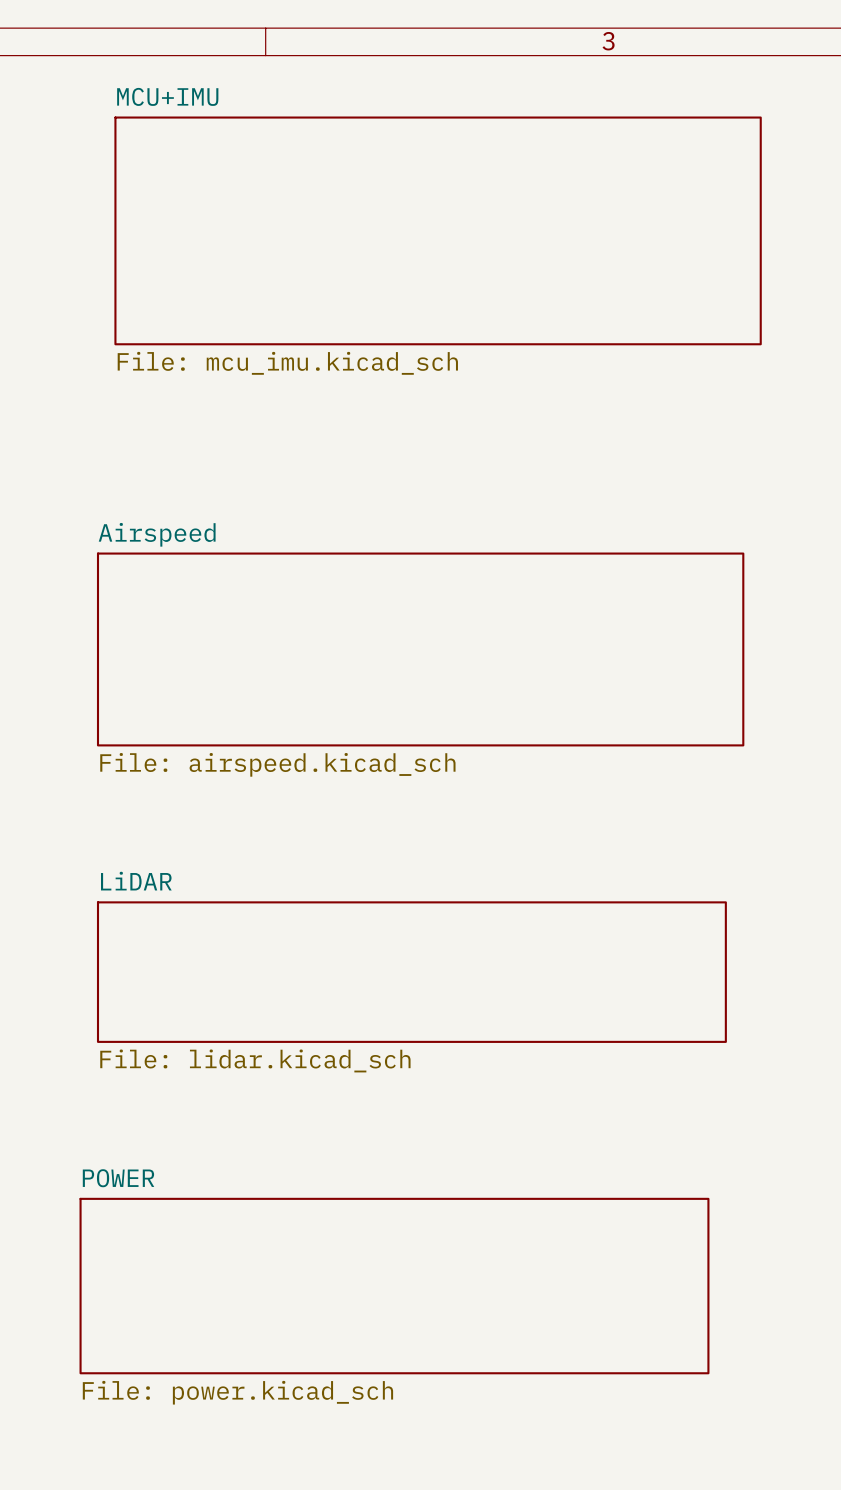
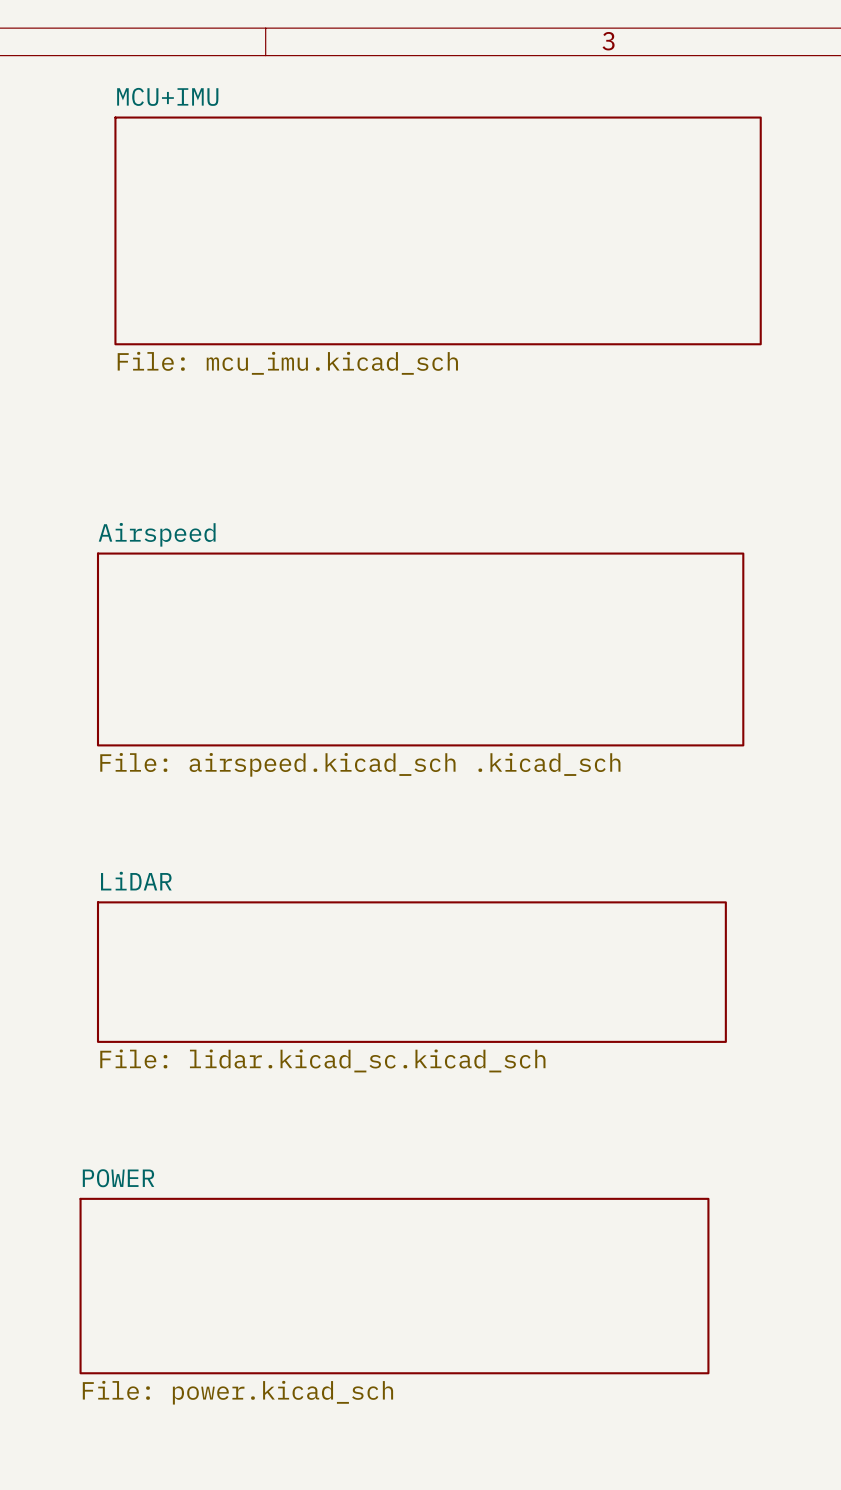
sheet Airspeed value: File: airspeed.kicad_sch (277, 764) -> File: airspeed.kicad_sch .kicad_sch (360, 764)
sheet LiDAR value: File: lidar.kicad_sch (255, 1060) -> File: lidar.kicad_sc.kicad_sch (322, 1060)

